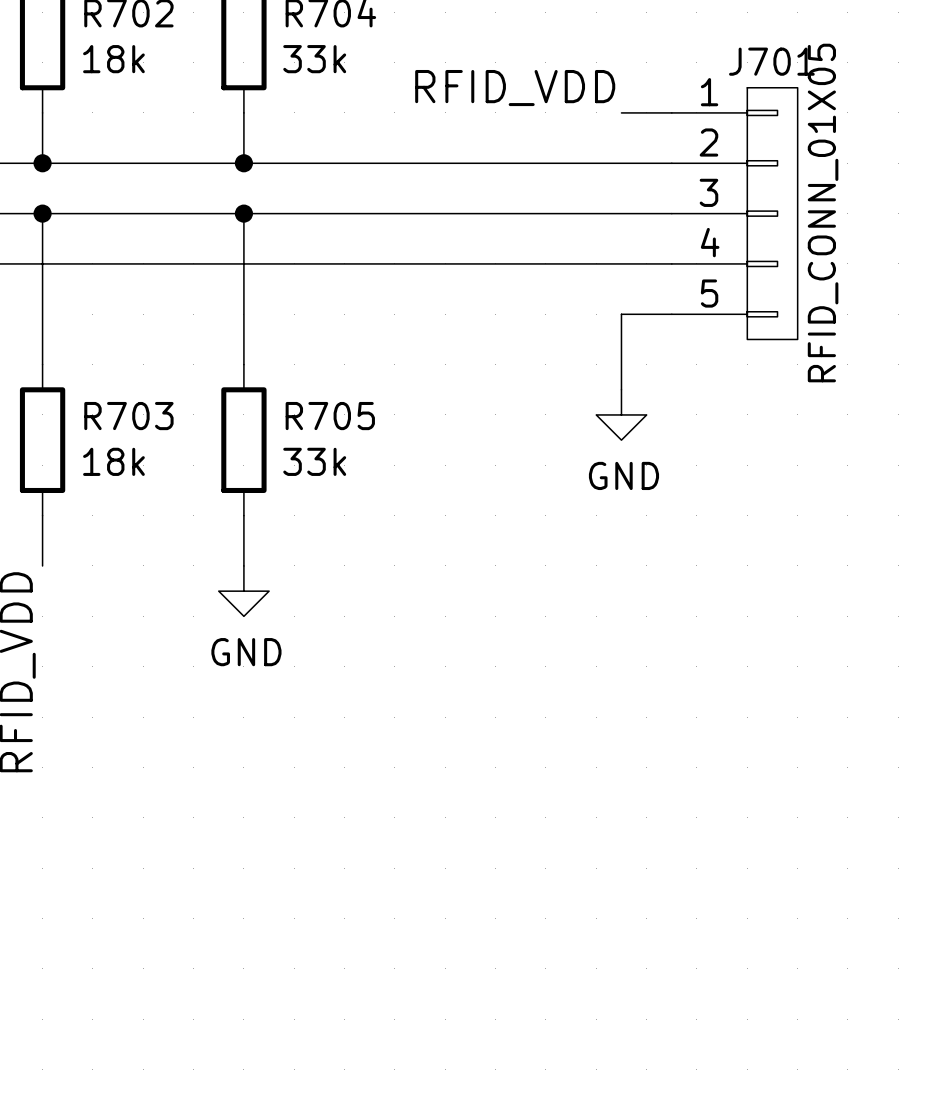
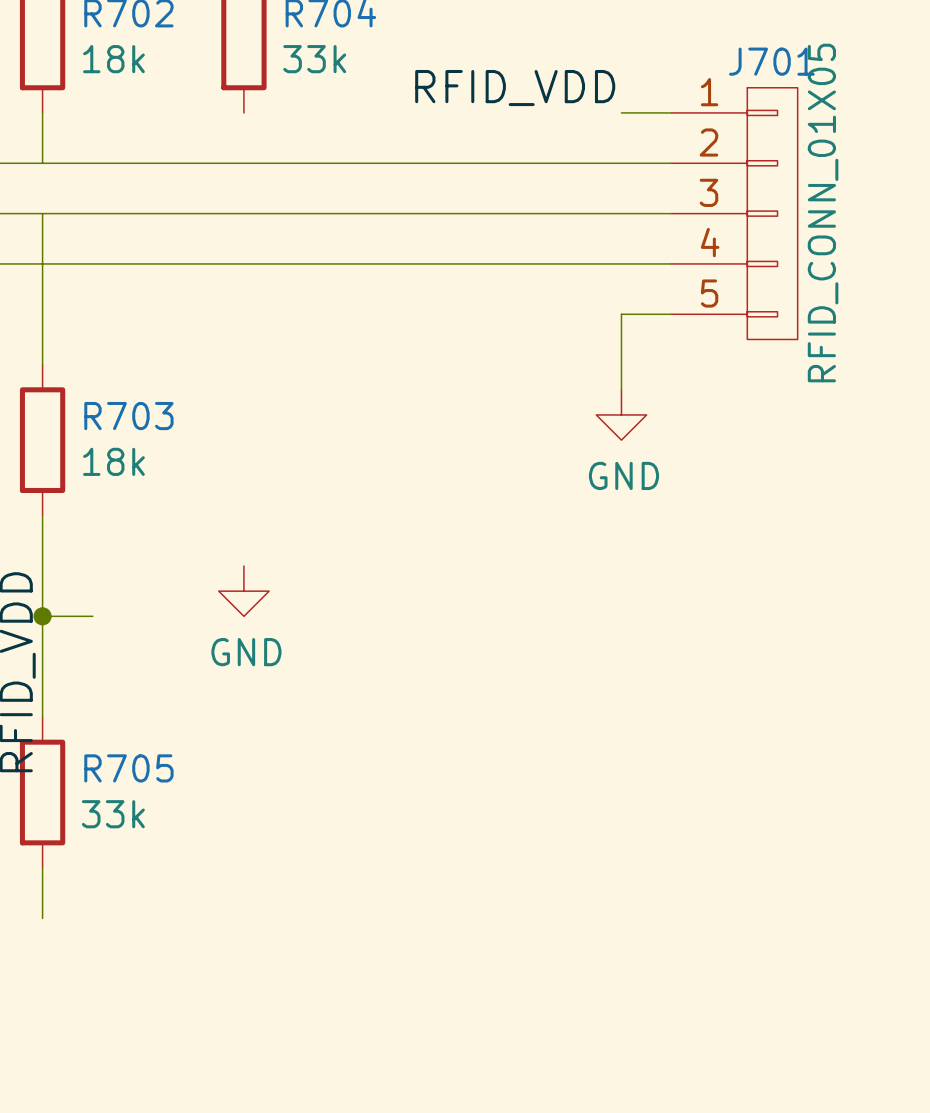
wire: (243, 112) (243, 163) -> none
junction: (42, 163) -> none
junction: (243, 163) -> none
junction: (42, 213) -> none
wire: (243, 213) (243, 364) -> (42, 565) (42, 717)
junction: (243, 213) -> none
R705 position: (243, 440) -> (42, 792)
wire: (243, 515) (243, 565) -> (42, 868) (42, 918)
wire: none -> (42, 616) (92, 616)
junction: none -> (42, 616)

